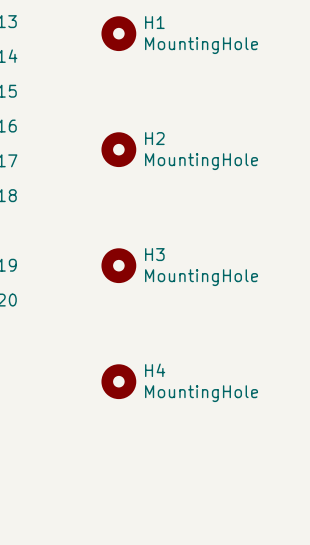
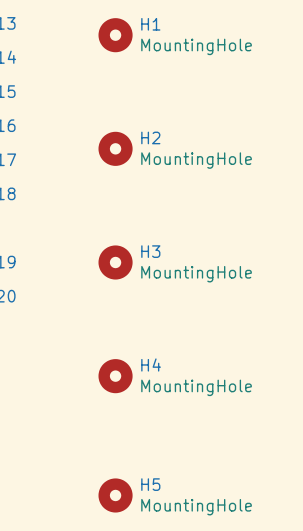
H5: none -> MountingHole (115, 495)

